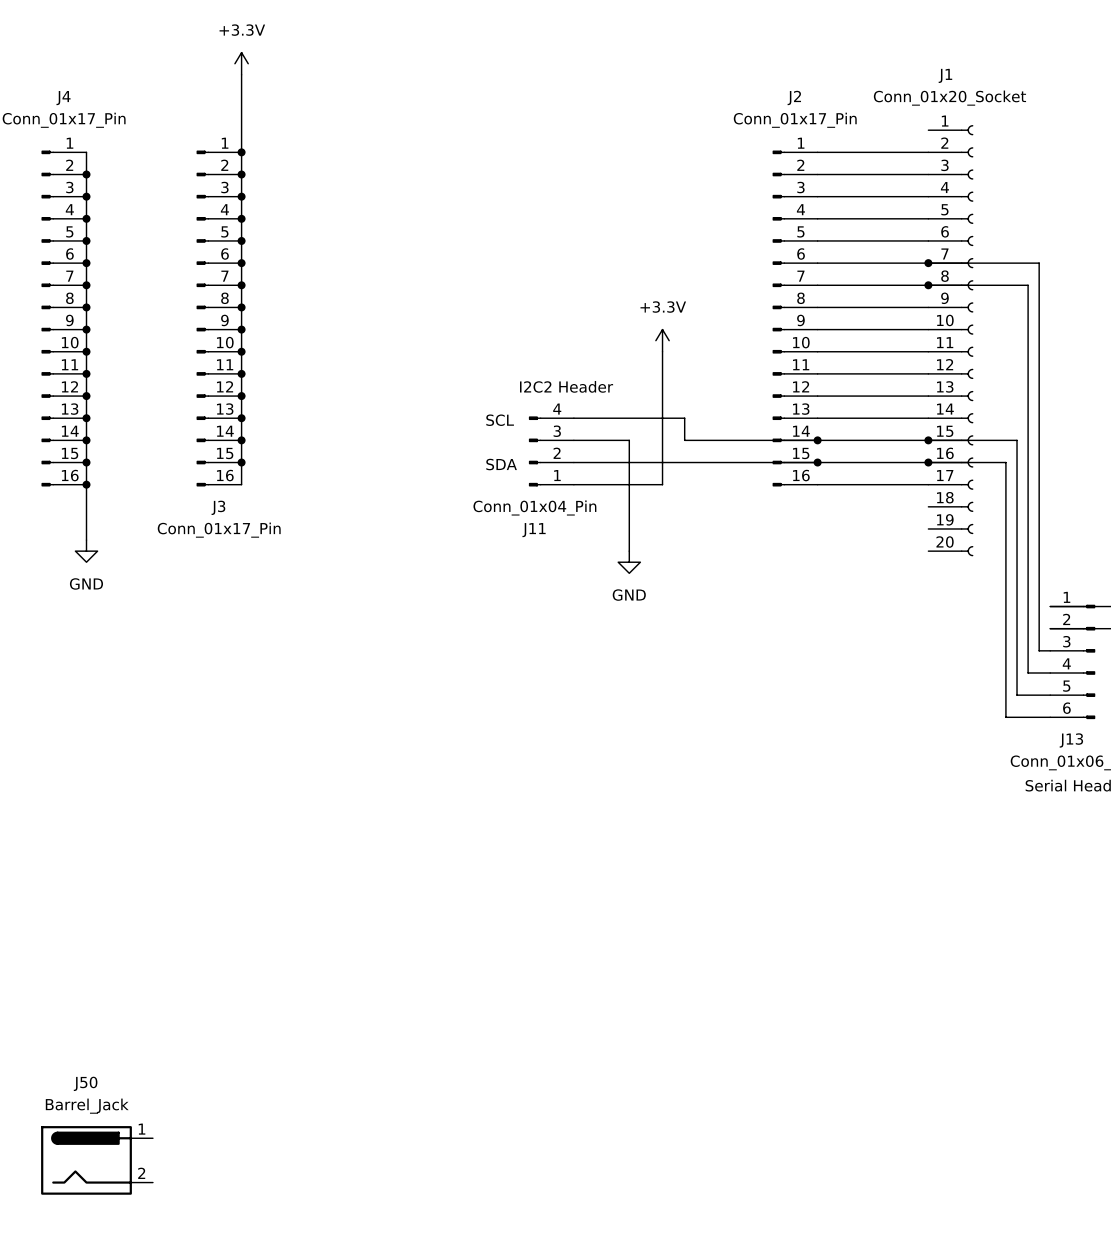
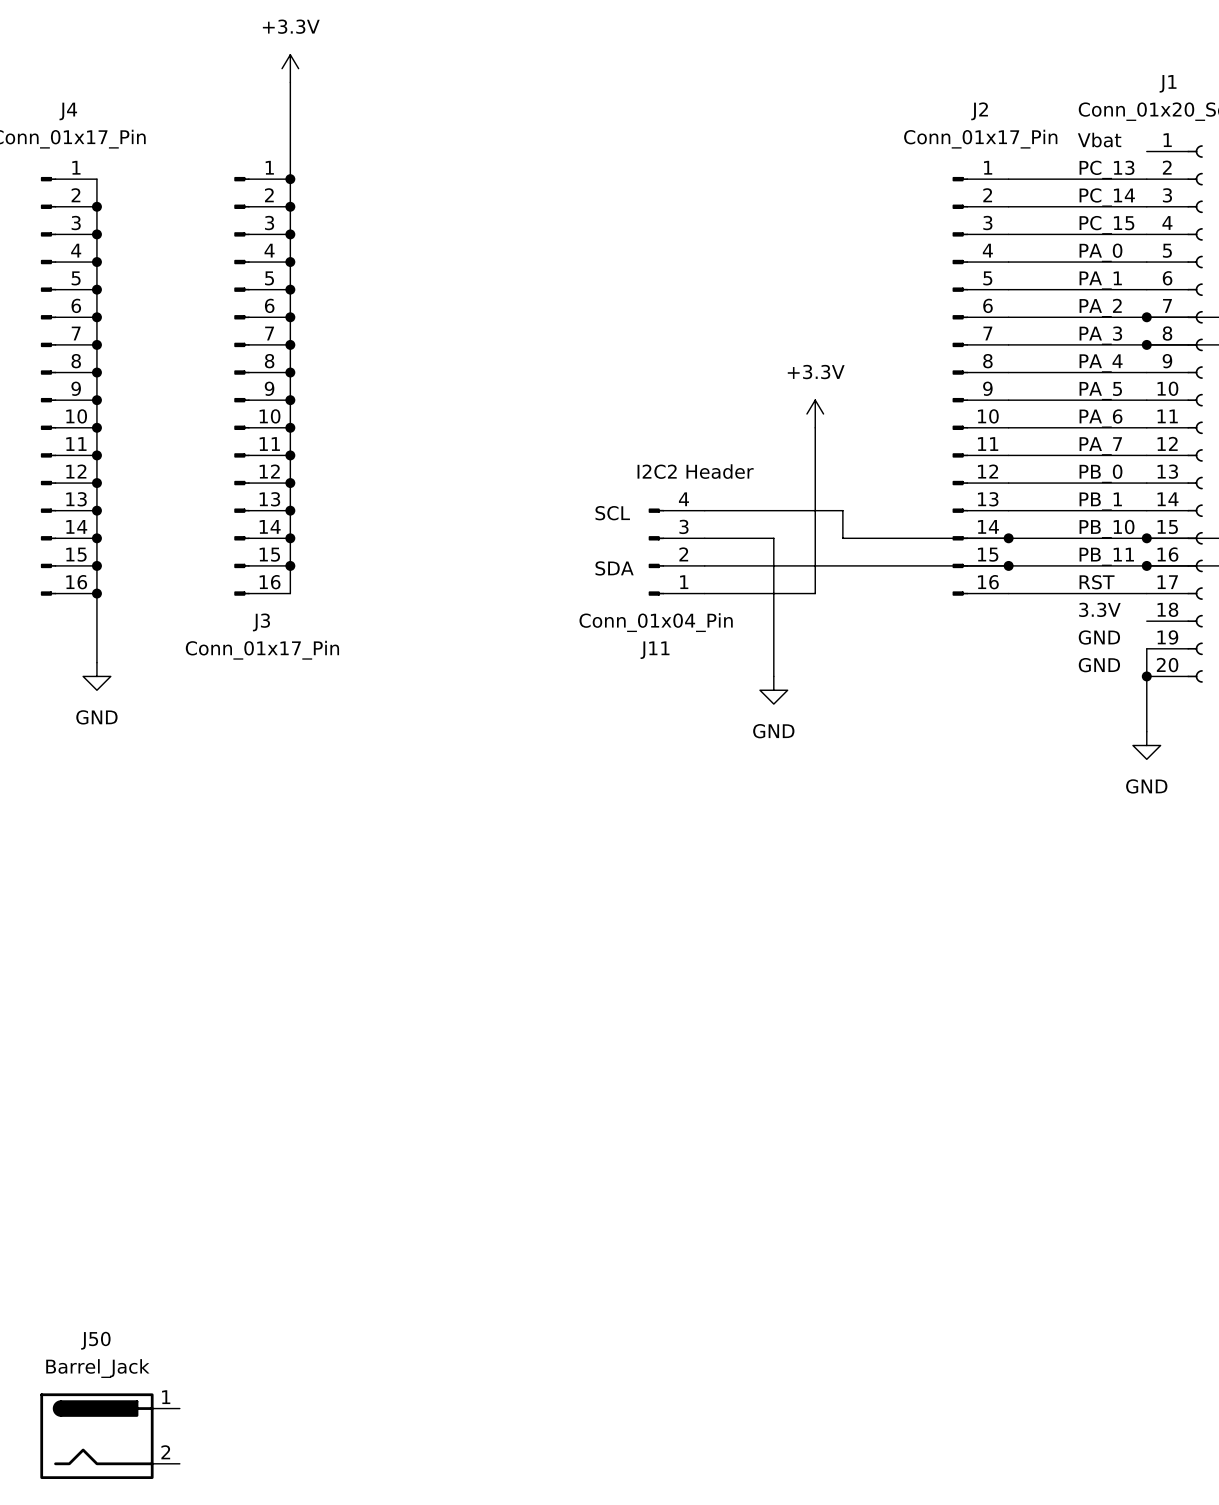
text: none -> Vbat (1099, 140)
text: none -> PC_13 (1107, 169)
text: none -> PC_14 (1107, 197)
text: none -> PC_15 (1106, 225)
text: none -> PA_0 (1100, 252)
text: none -> PA_1 (1100, 280)
text: none -> PA_2 (1100, 308)
text: none -> PA_3 (1100, 335)
text: none -> PA_4 (1101, 363)
text: none -> PA_5 (1100, 391)
text: none -> PA_6 (1101, 418)
text: none -> PA_7 (1100, 446)
text: none -> PB_0 (1100, 473)
text: none -> PB_1 (1100, 501)
text: none -> PB_10 (1107, 529)
text: none -> PB_11 (1106, 556)
text: none -> RST (1097, 582)
text: none -> 3.3V (1099, 609)
text: none -> GND (1099, 637)
wire: none -> (1146, 648) (1146, 731)
text: none -> GND (1099, 665)
junction: none -> (1146, 676)
power symbol: none -> GND (1146, 745)

